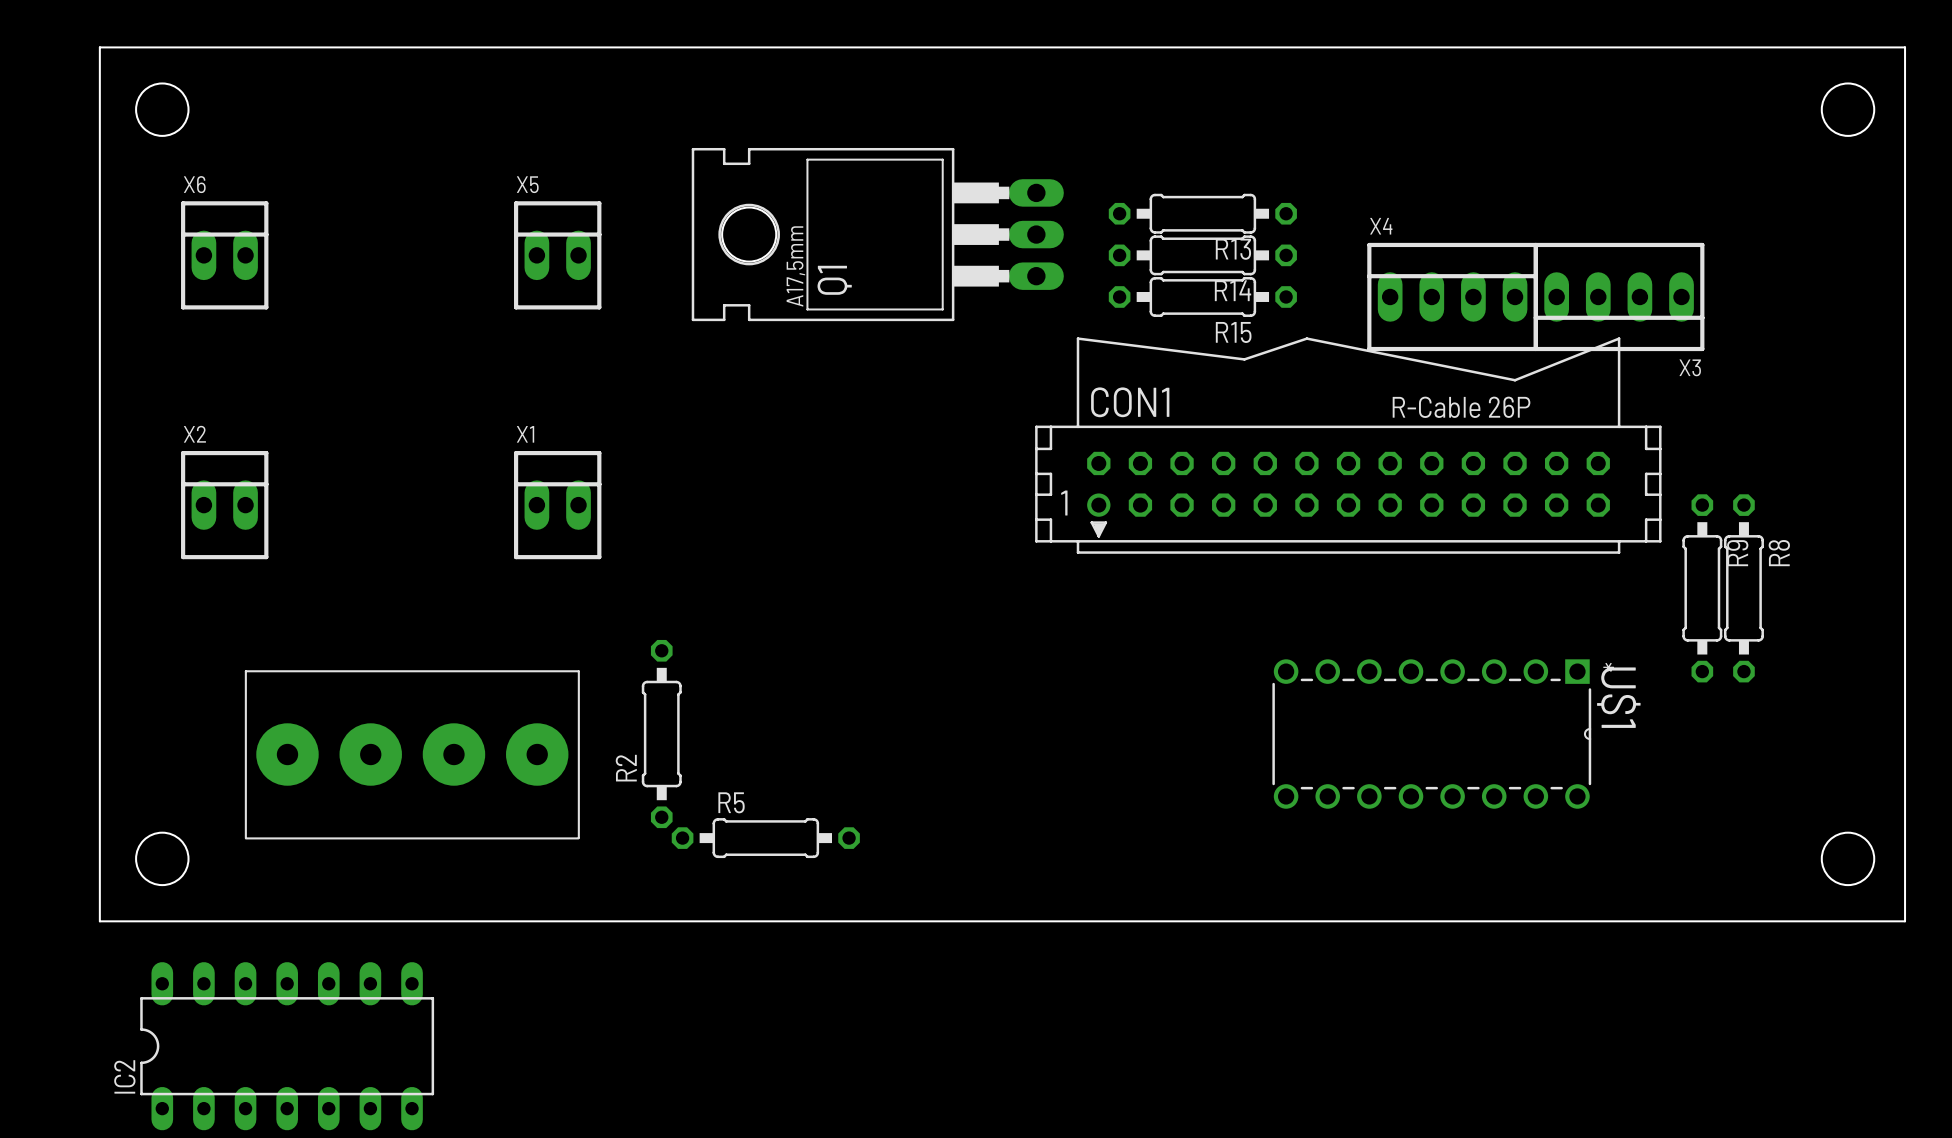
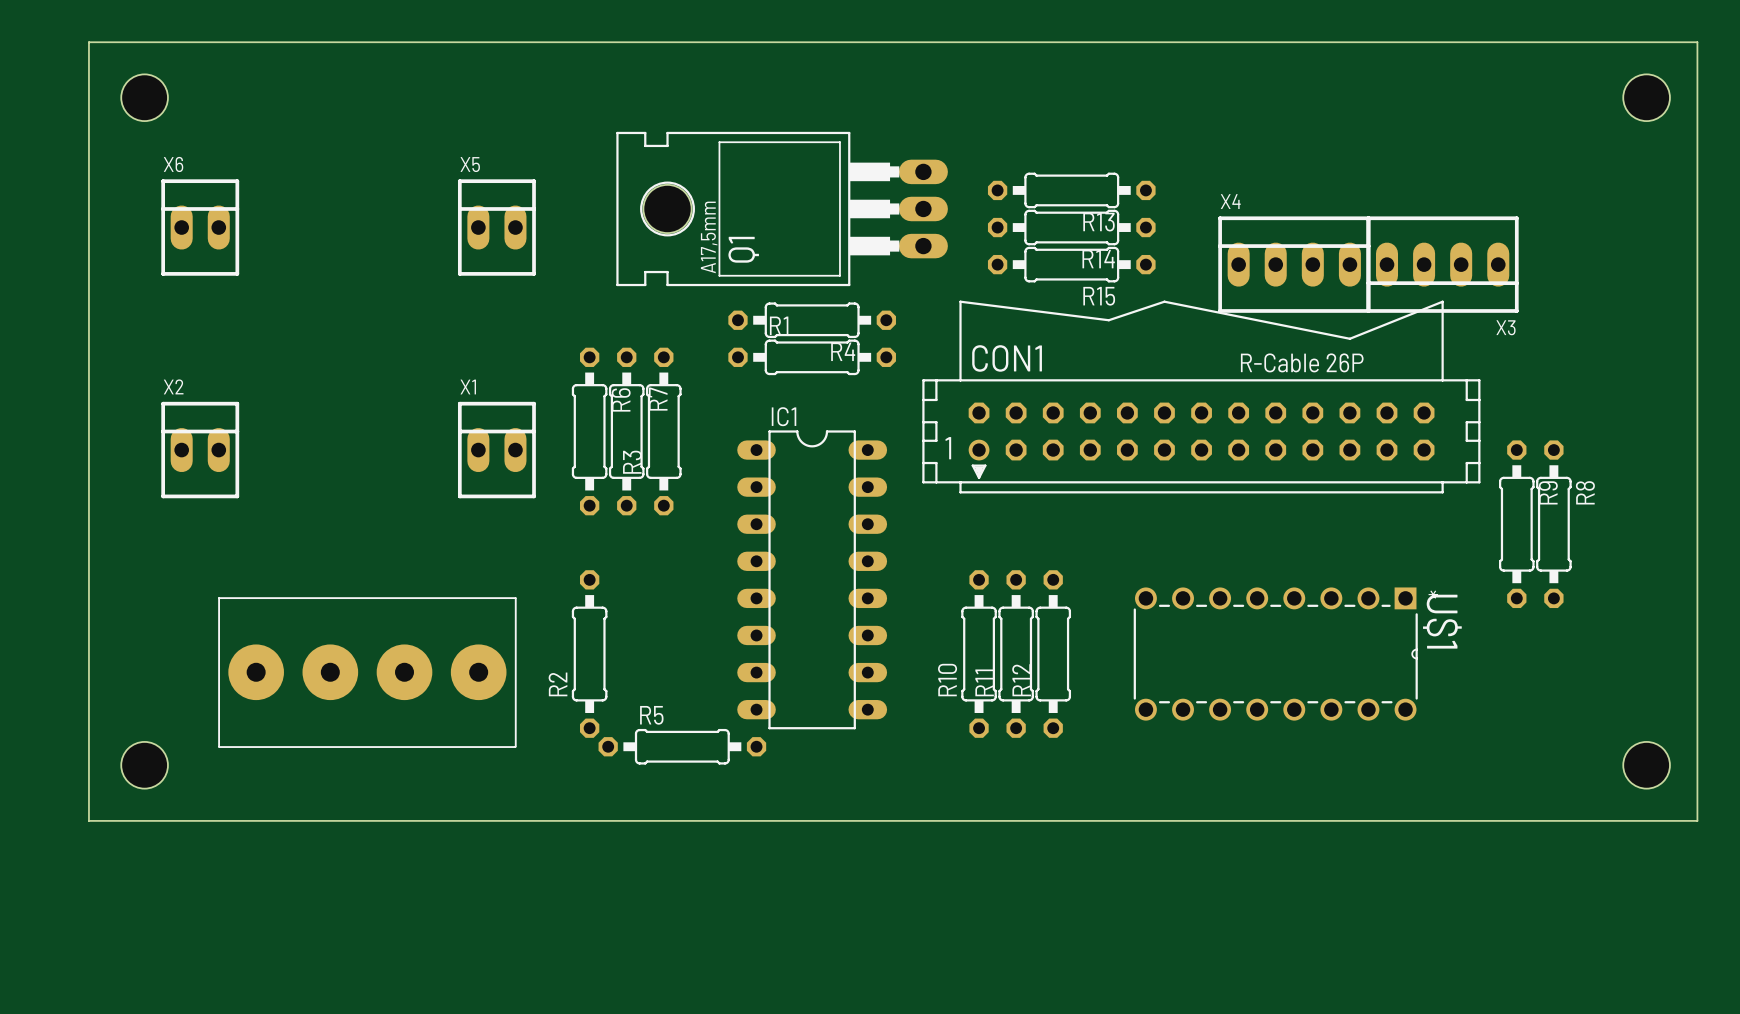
R4: none -> (812, 320)
R1: none -> (812, 357)
R6: none -> (589, 431)
R7: none -> (626, 431)
R3: none -> (663, 431)
IC1: none -> (812, 579)
R10: none -> (979, 654)
R11: none -> (1016, 654)
R12: none -> (1053, 654)
IC2: (287, 1046) -> none

